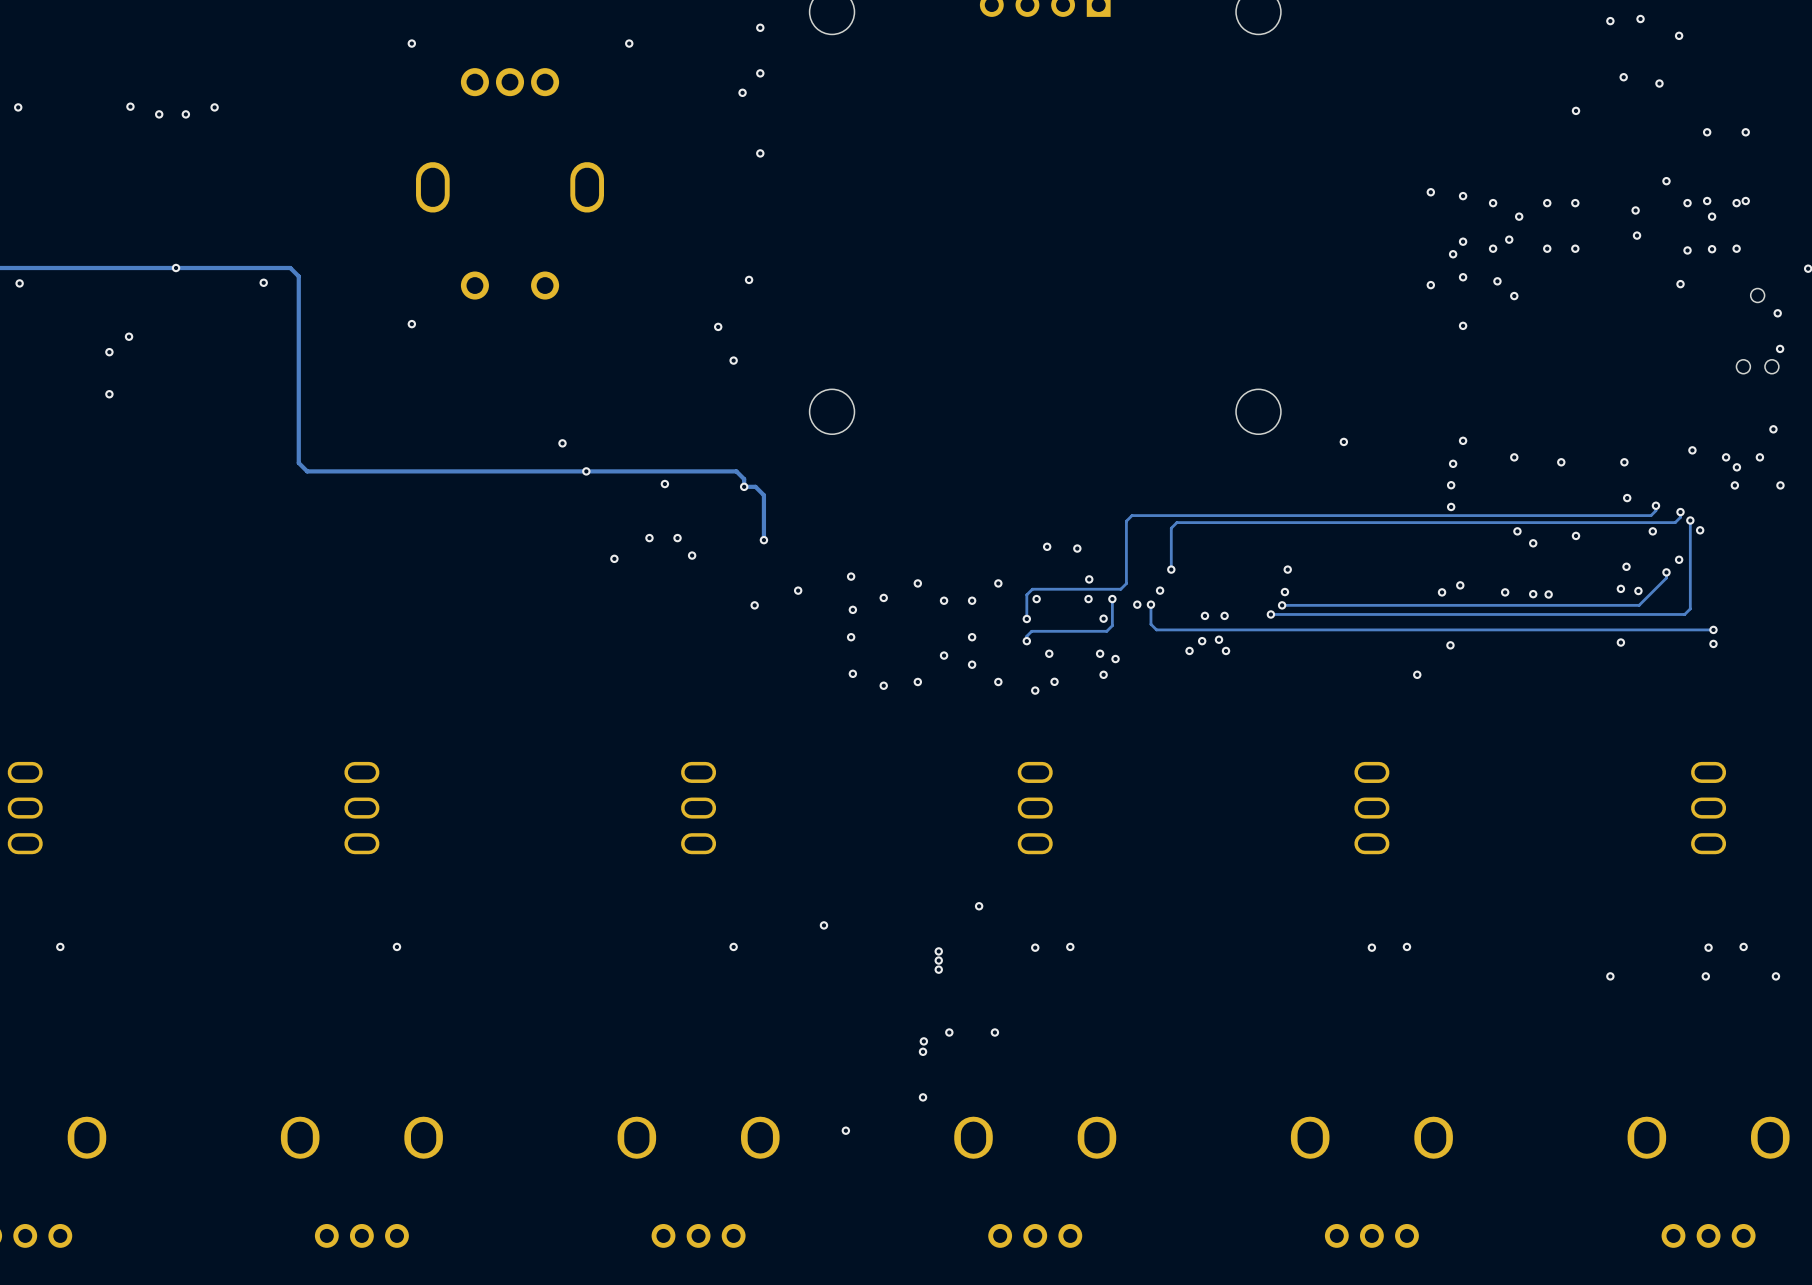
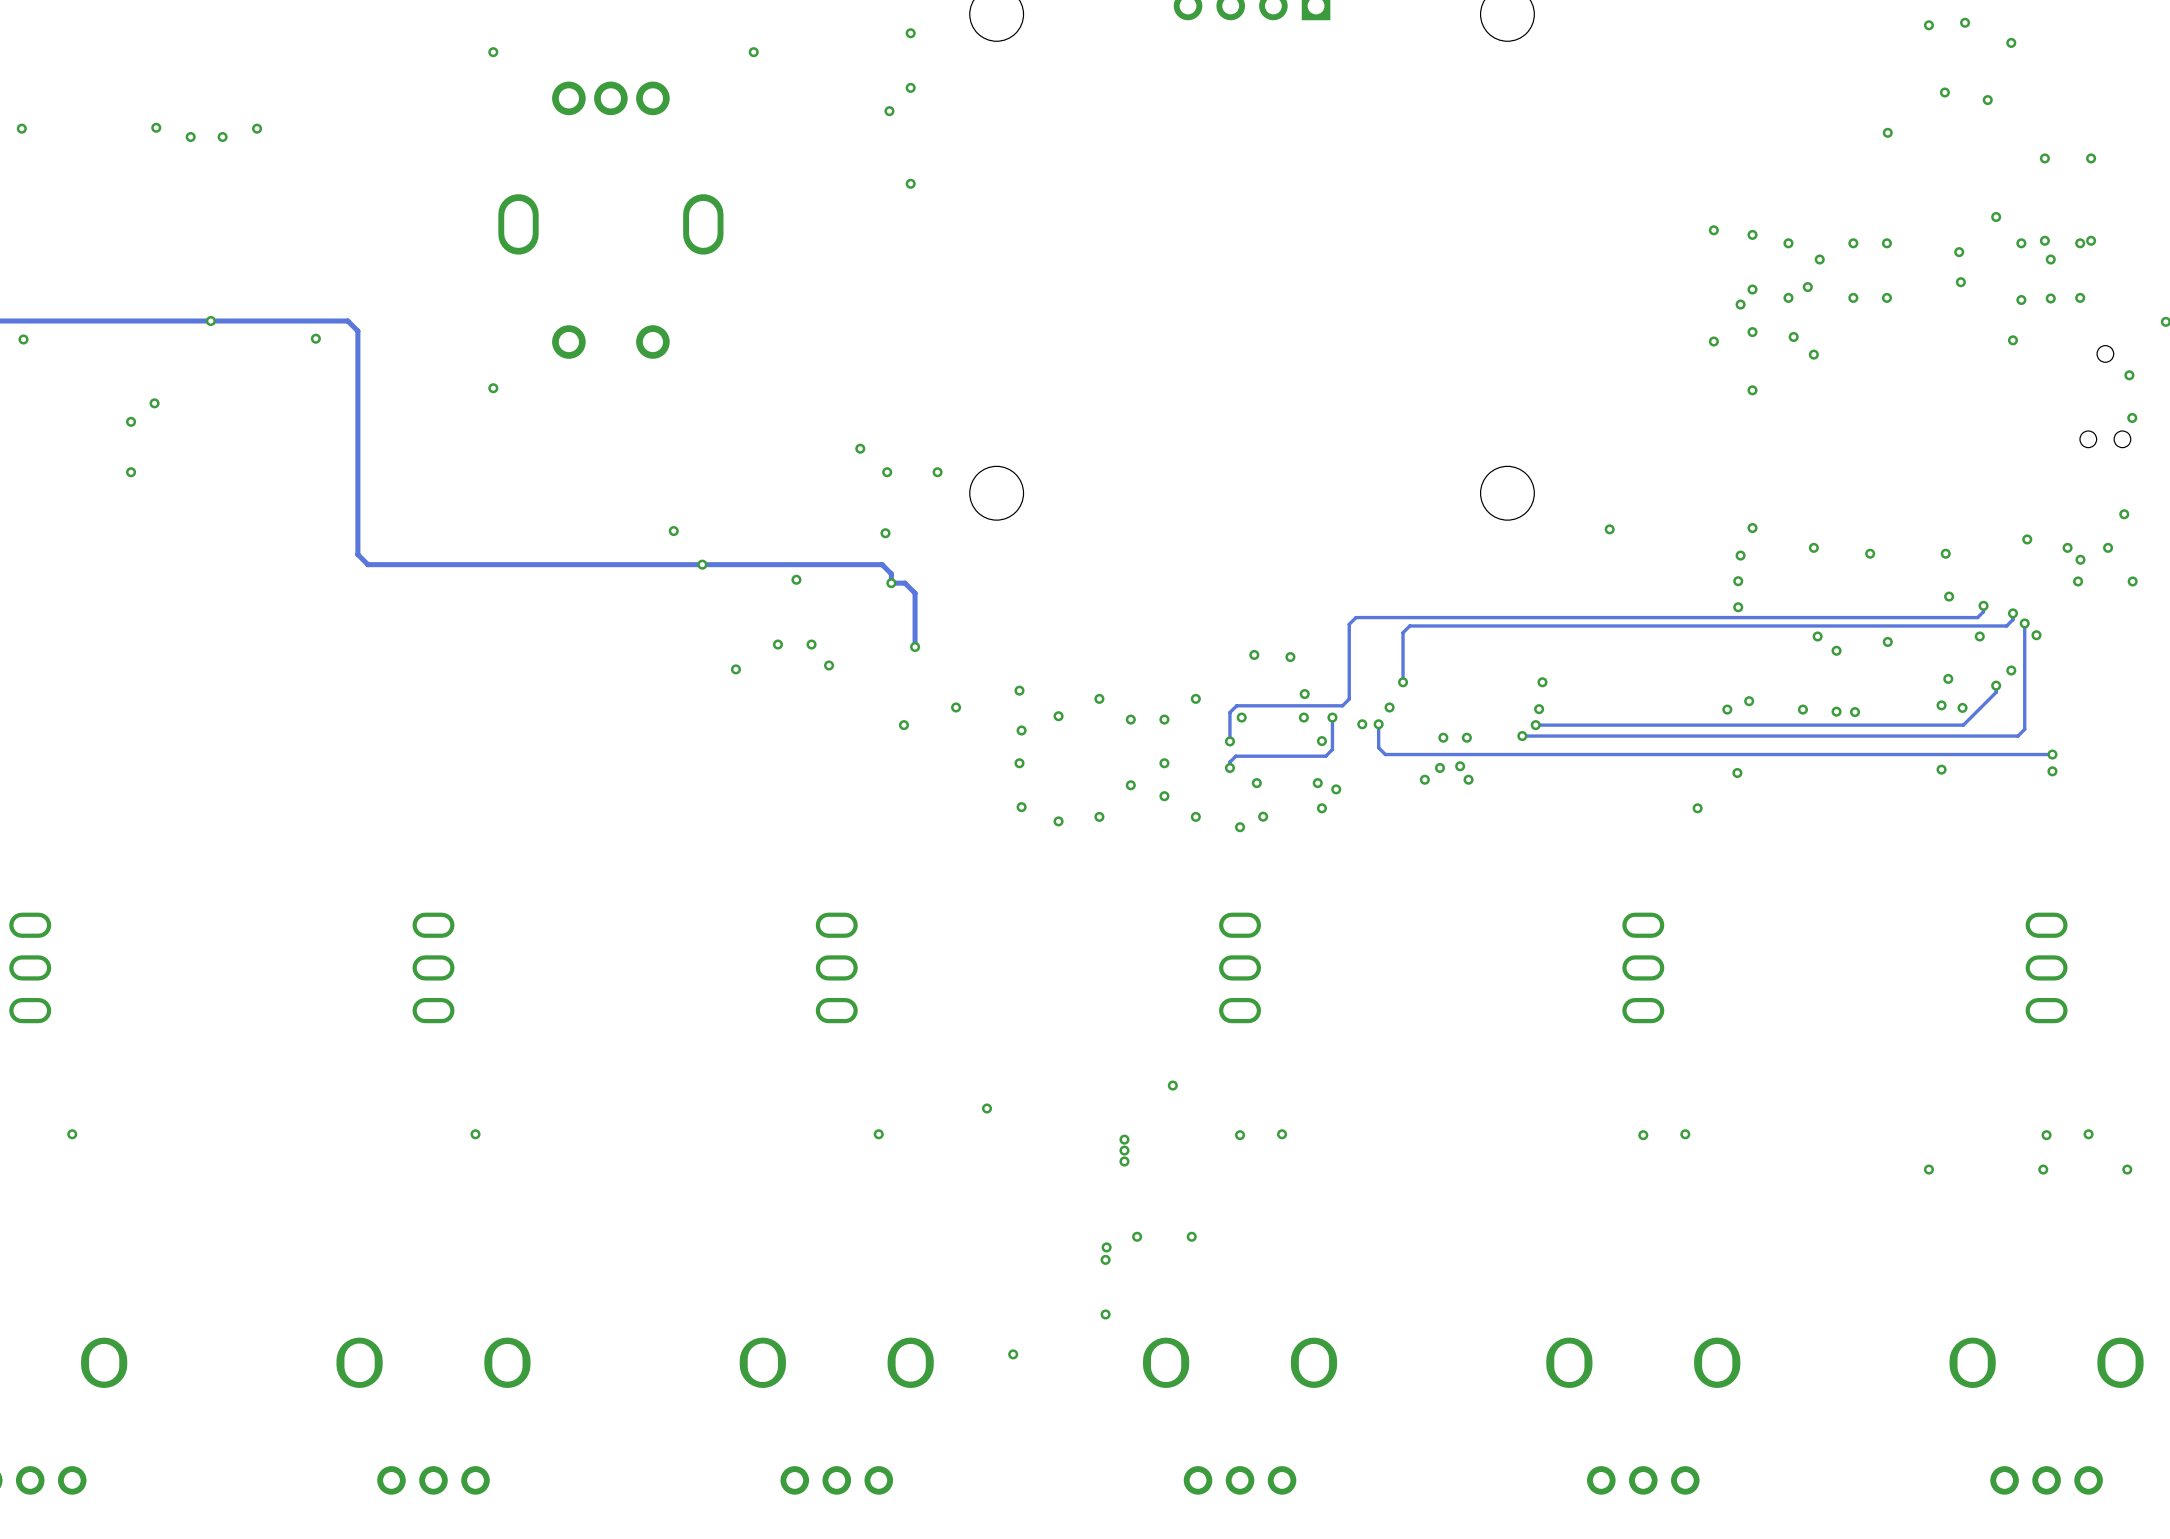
via: (749, 279) -> none
via: (718, 326) -> none
via: (733, 360) -> none
via: none -> (860, 448)
via: none -> (887, 472)
via: none -> (937, 472)
via: none -> (885, 533)

